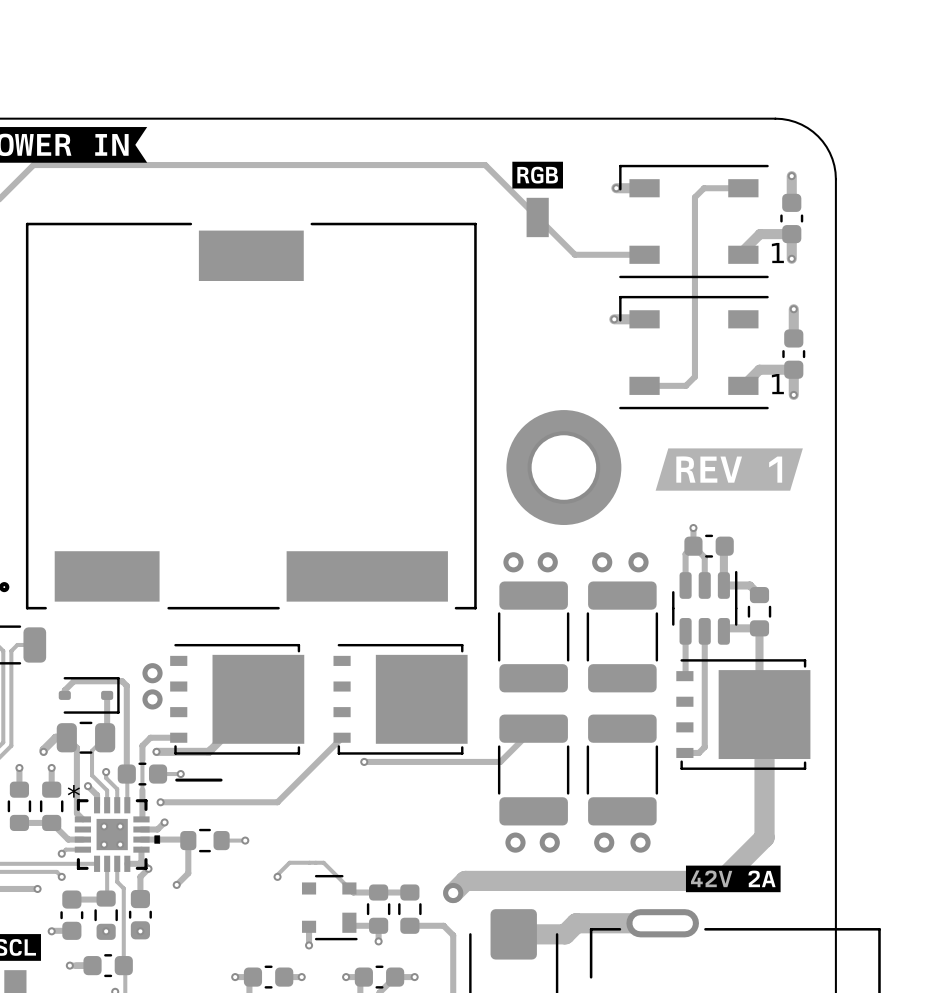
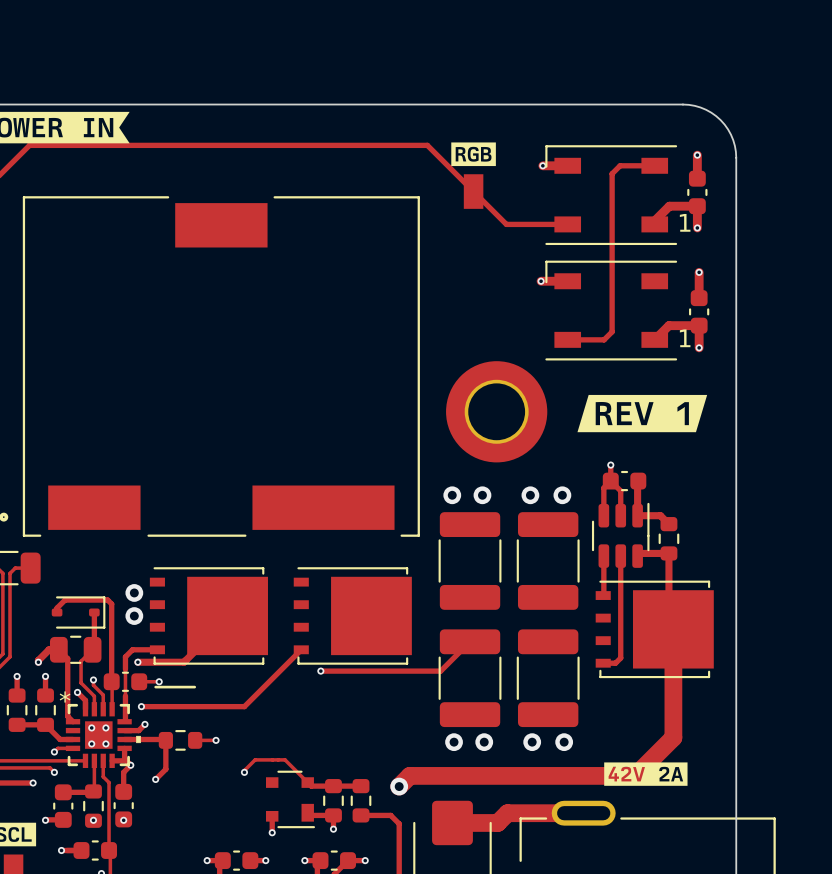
drawing shape: [655, 448, 803, 491] -> [577, 394, 708, 433]

